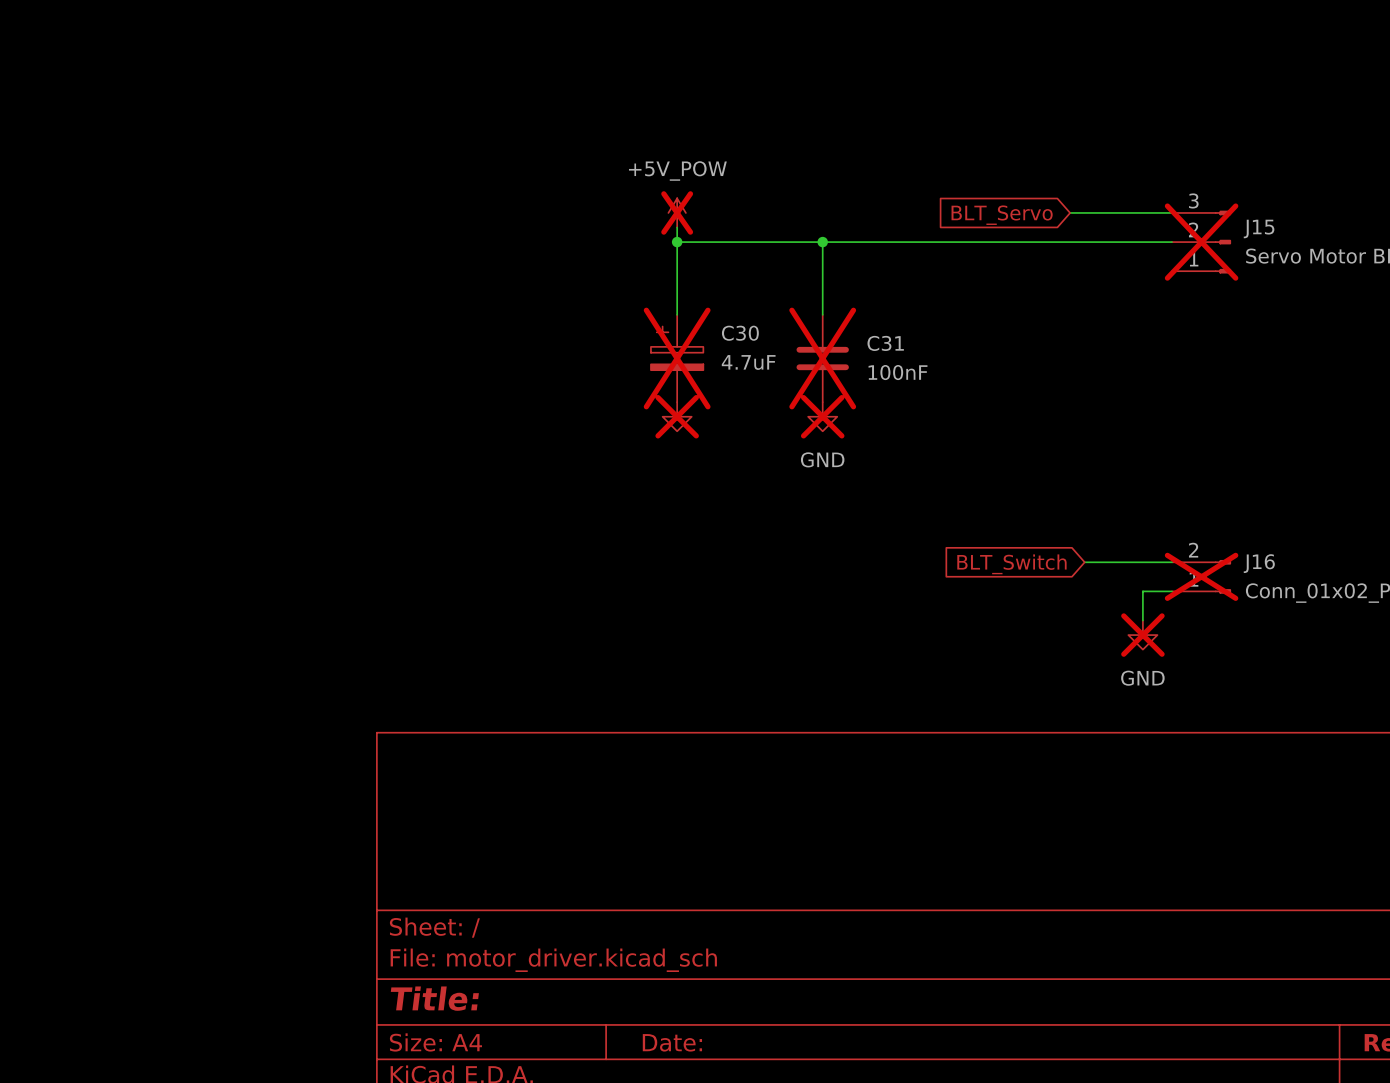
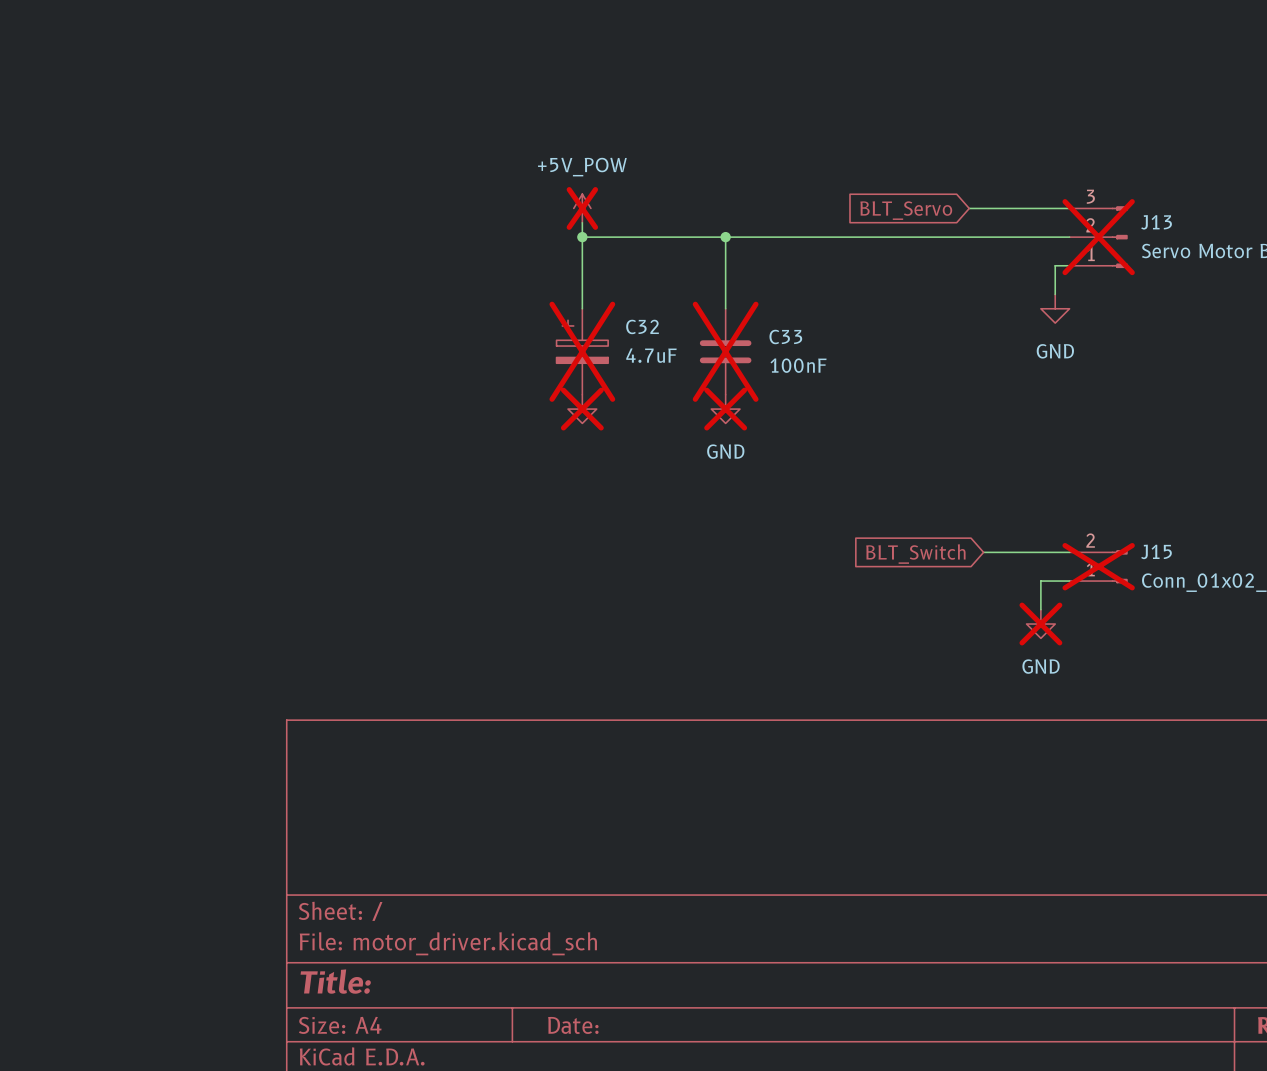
J15 name: J15 (1259, 228) -> J13 (1156, 222)
wire: none -> (1069, 265) (1055, 265) (1055, 294)
power symbol: none -> GND (1055, 308)
C30 name: C30 (740, 333) -> C32 (642, 326)
C31 name: C31 (885, 343) -> C33 (785, 336)
J16 name: J16 (1259, 563) -> J15 (1156, 551)

